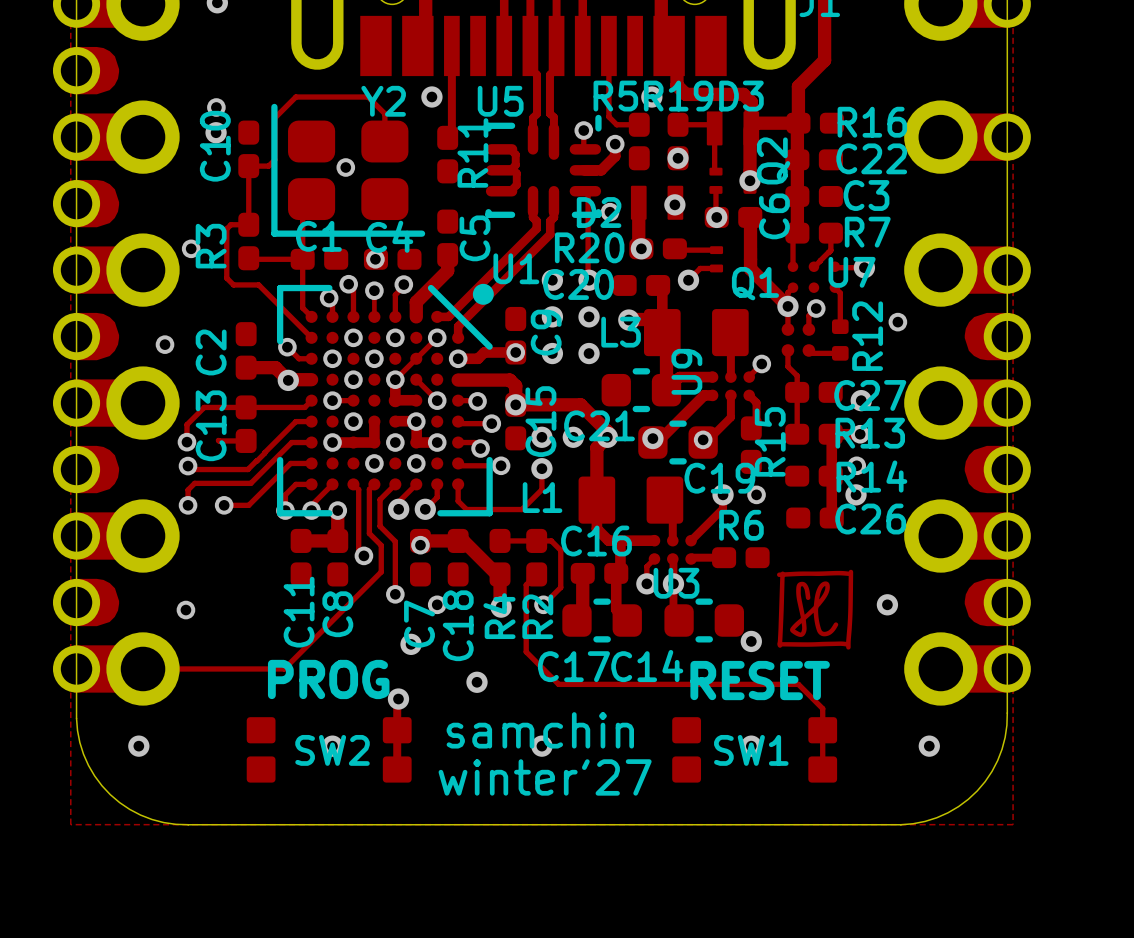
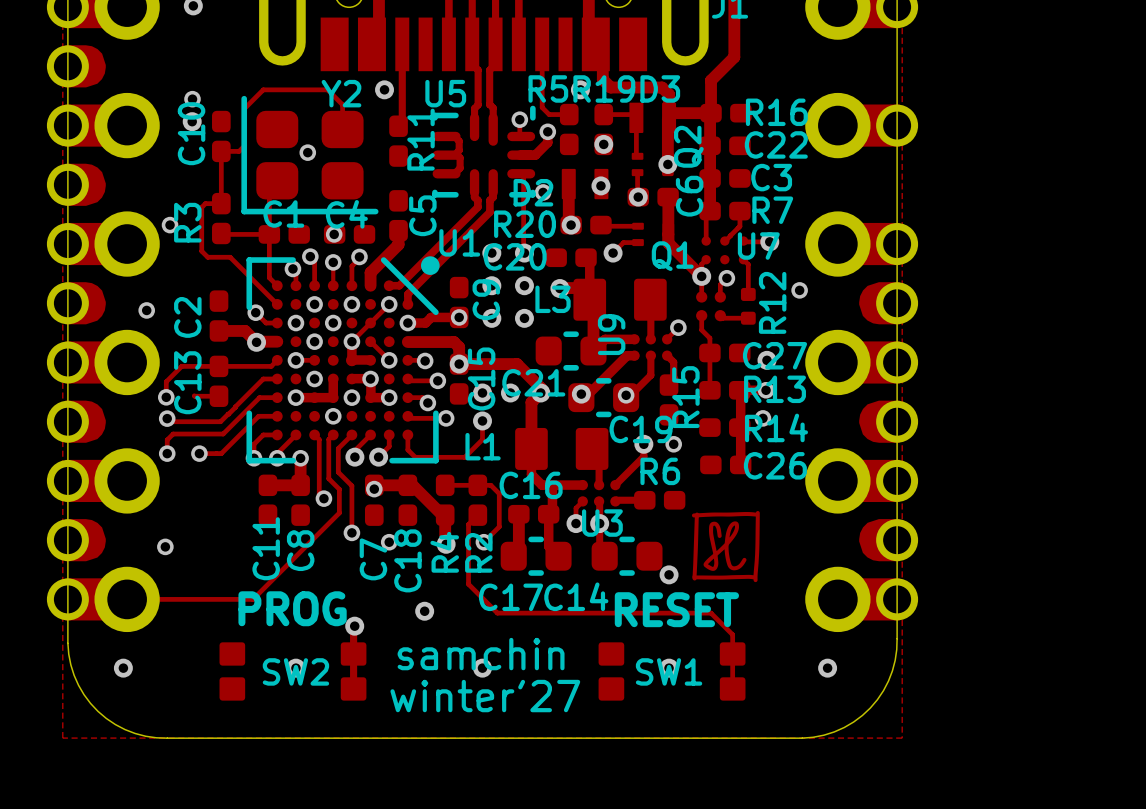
via: (416, 463) -> none
via: (856, 494) -> none
via: (887, 604) -> none
via: (411, 644) -> none

